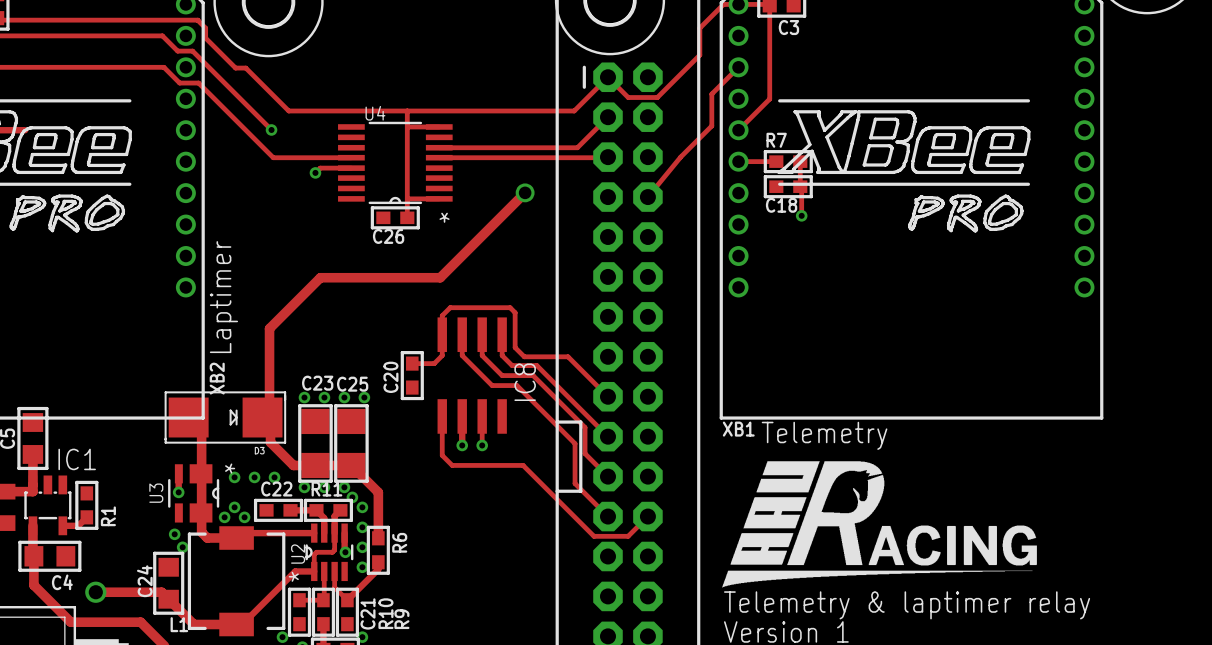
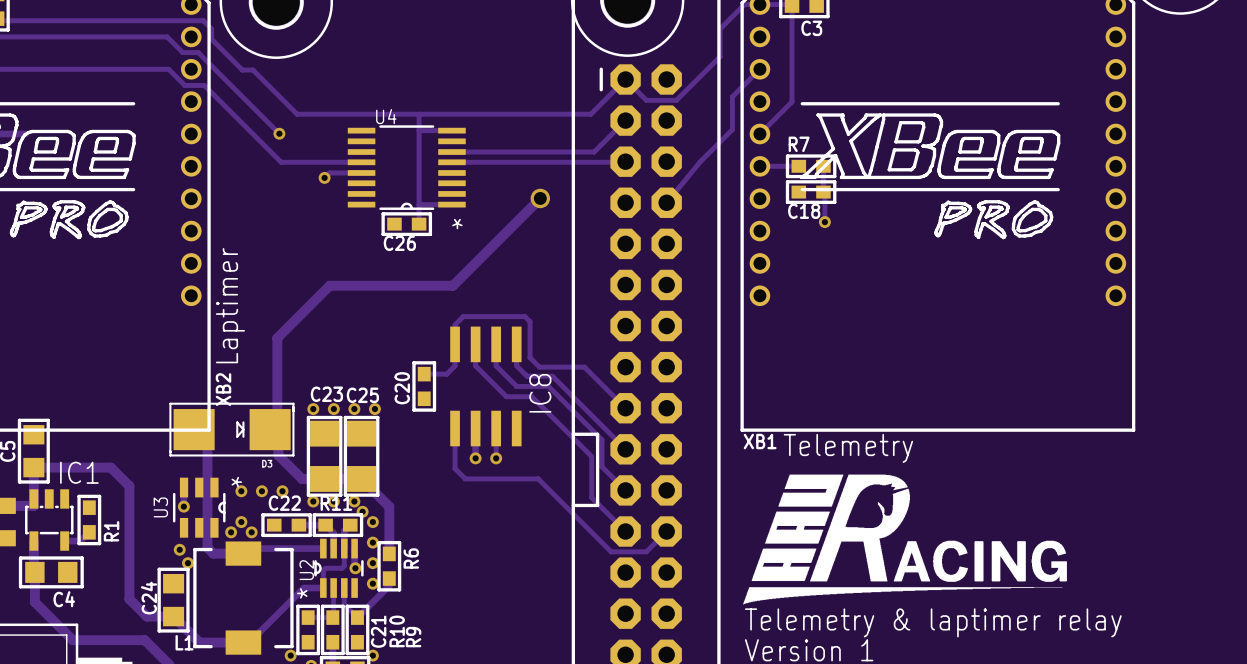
track: (95, 592) (161, 592) (168, 599) -> (33, 467) (110, 467) (129, 486) (129, 599) (146, 616) (173, 616)
via: (95, 592) -> none

